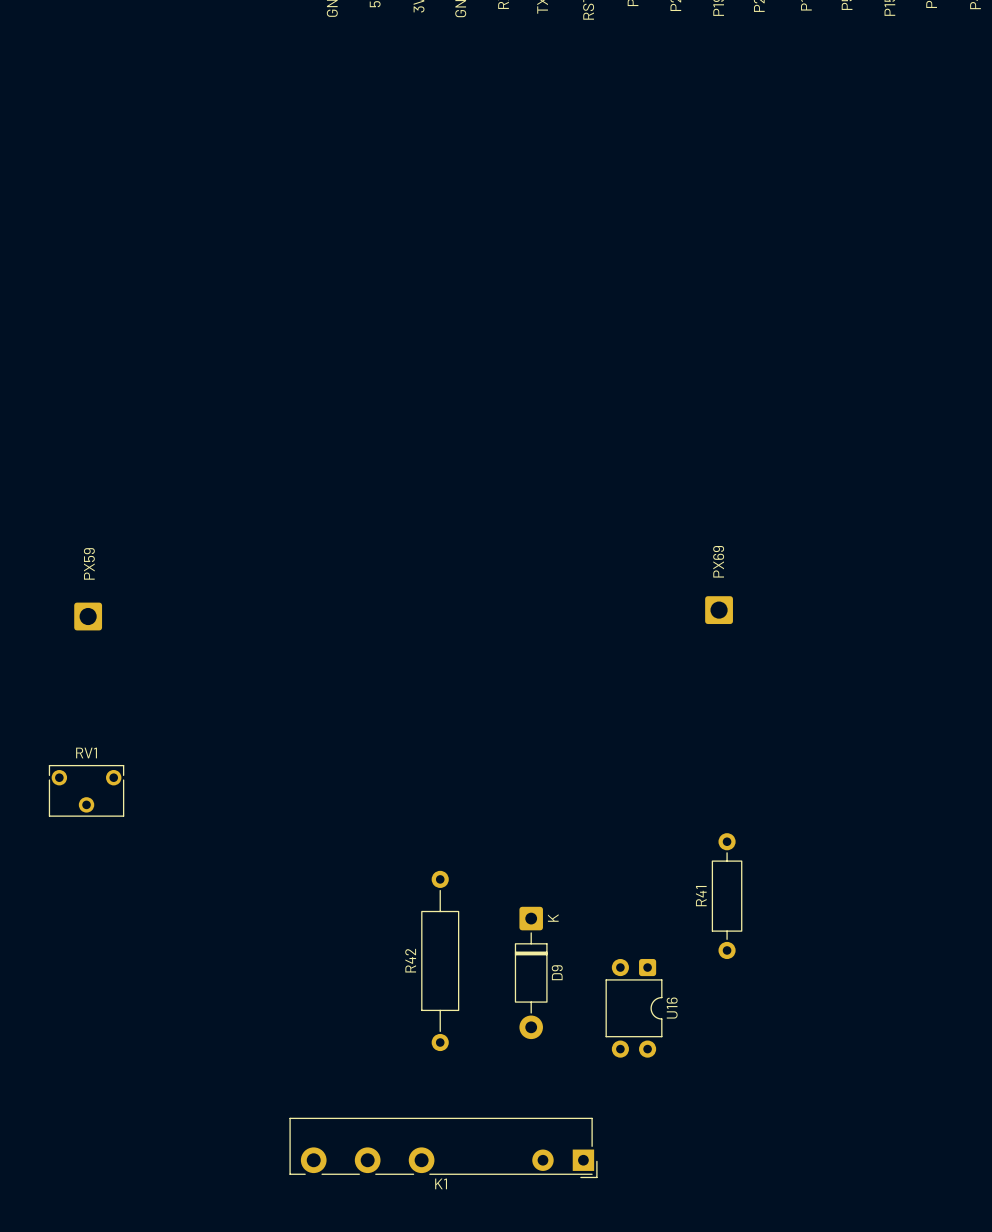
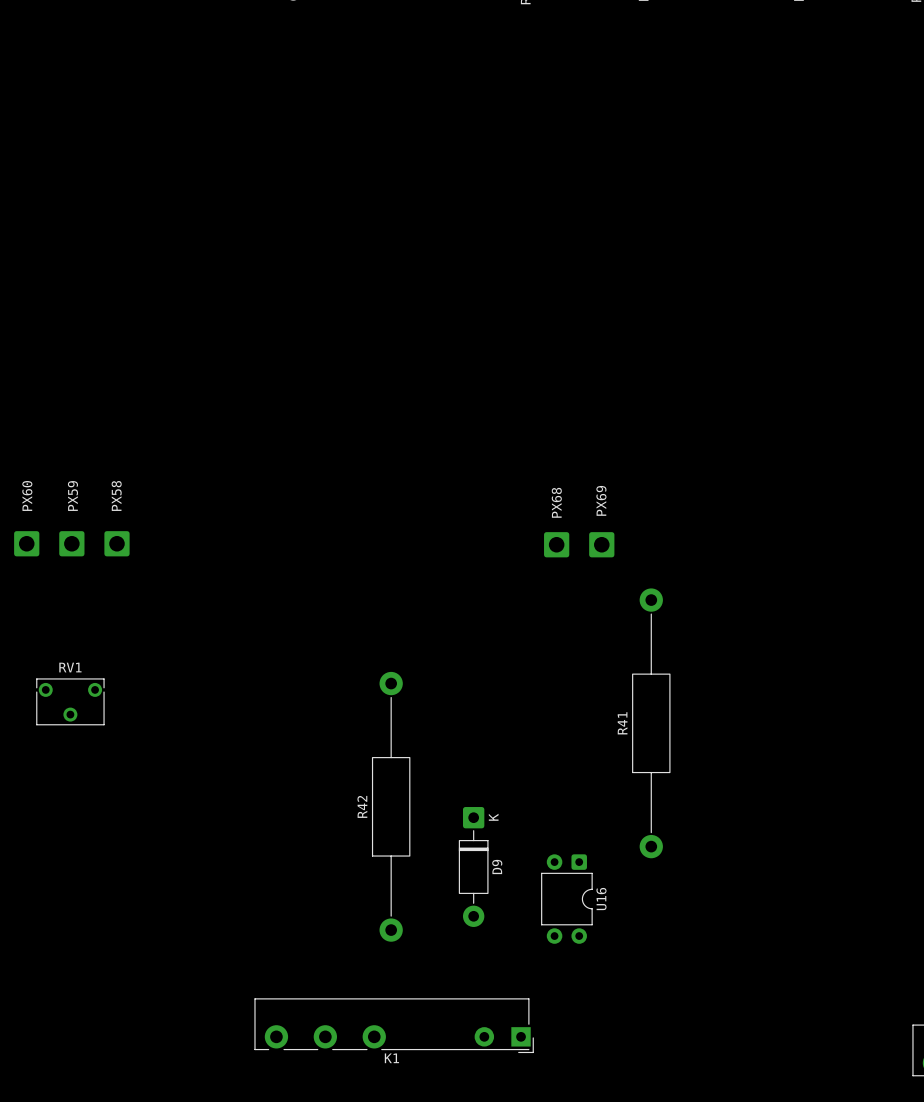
PX69 position: (719, 610) -> (601, 544)
PX60: none -> (26, 543)
PX58: none -> (116, 543)
PX68: none -> (556, 544)
R41 footprint: [711, 833, 743, 960] -> [632, 588, 671, 859]
R42 footprint: [421, 870, 460, 1052] -> [371, 671, 411, 942]

